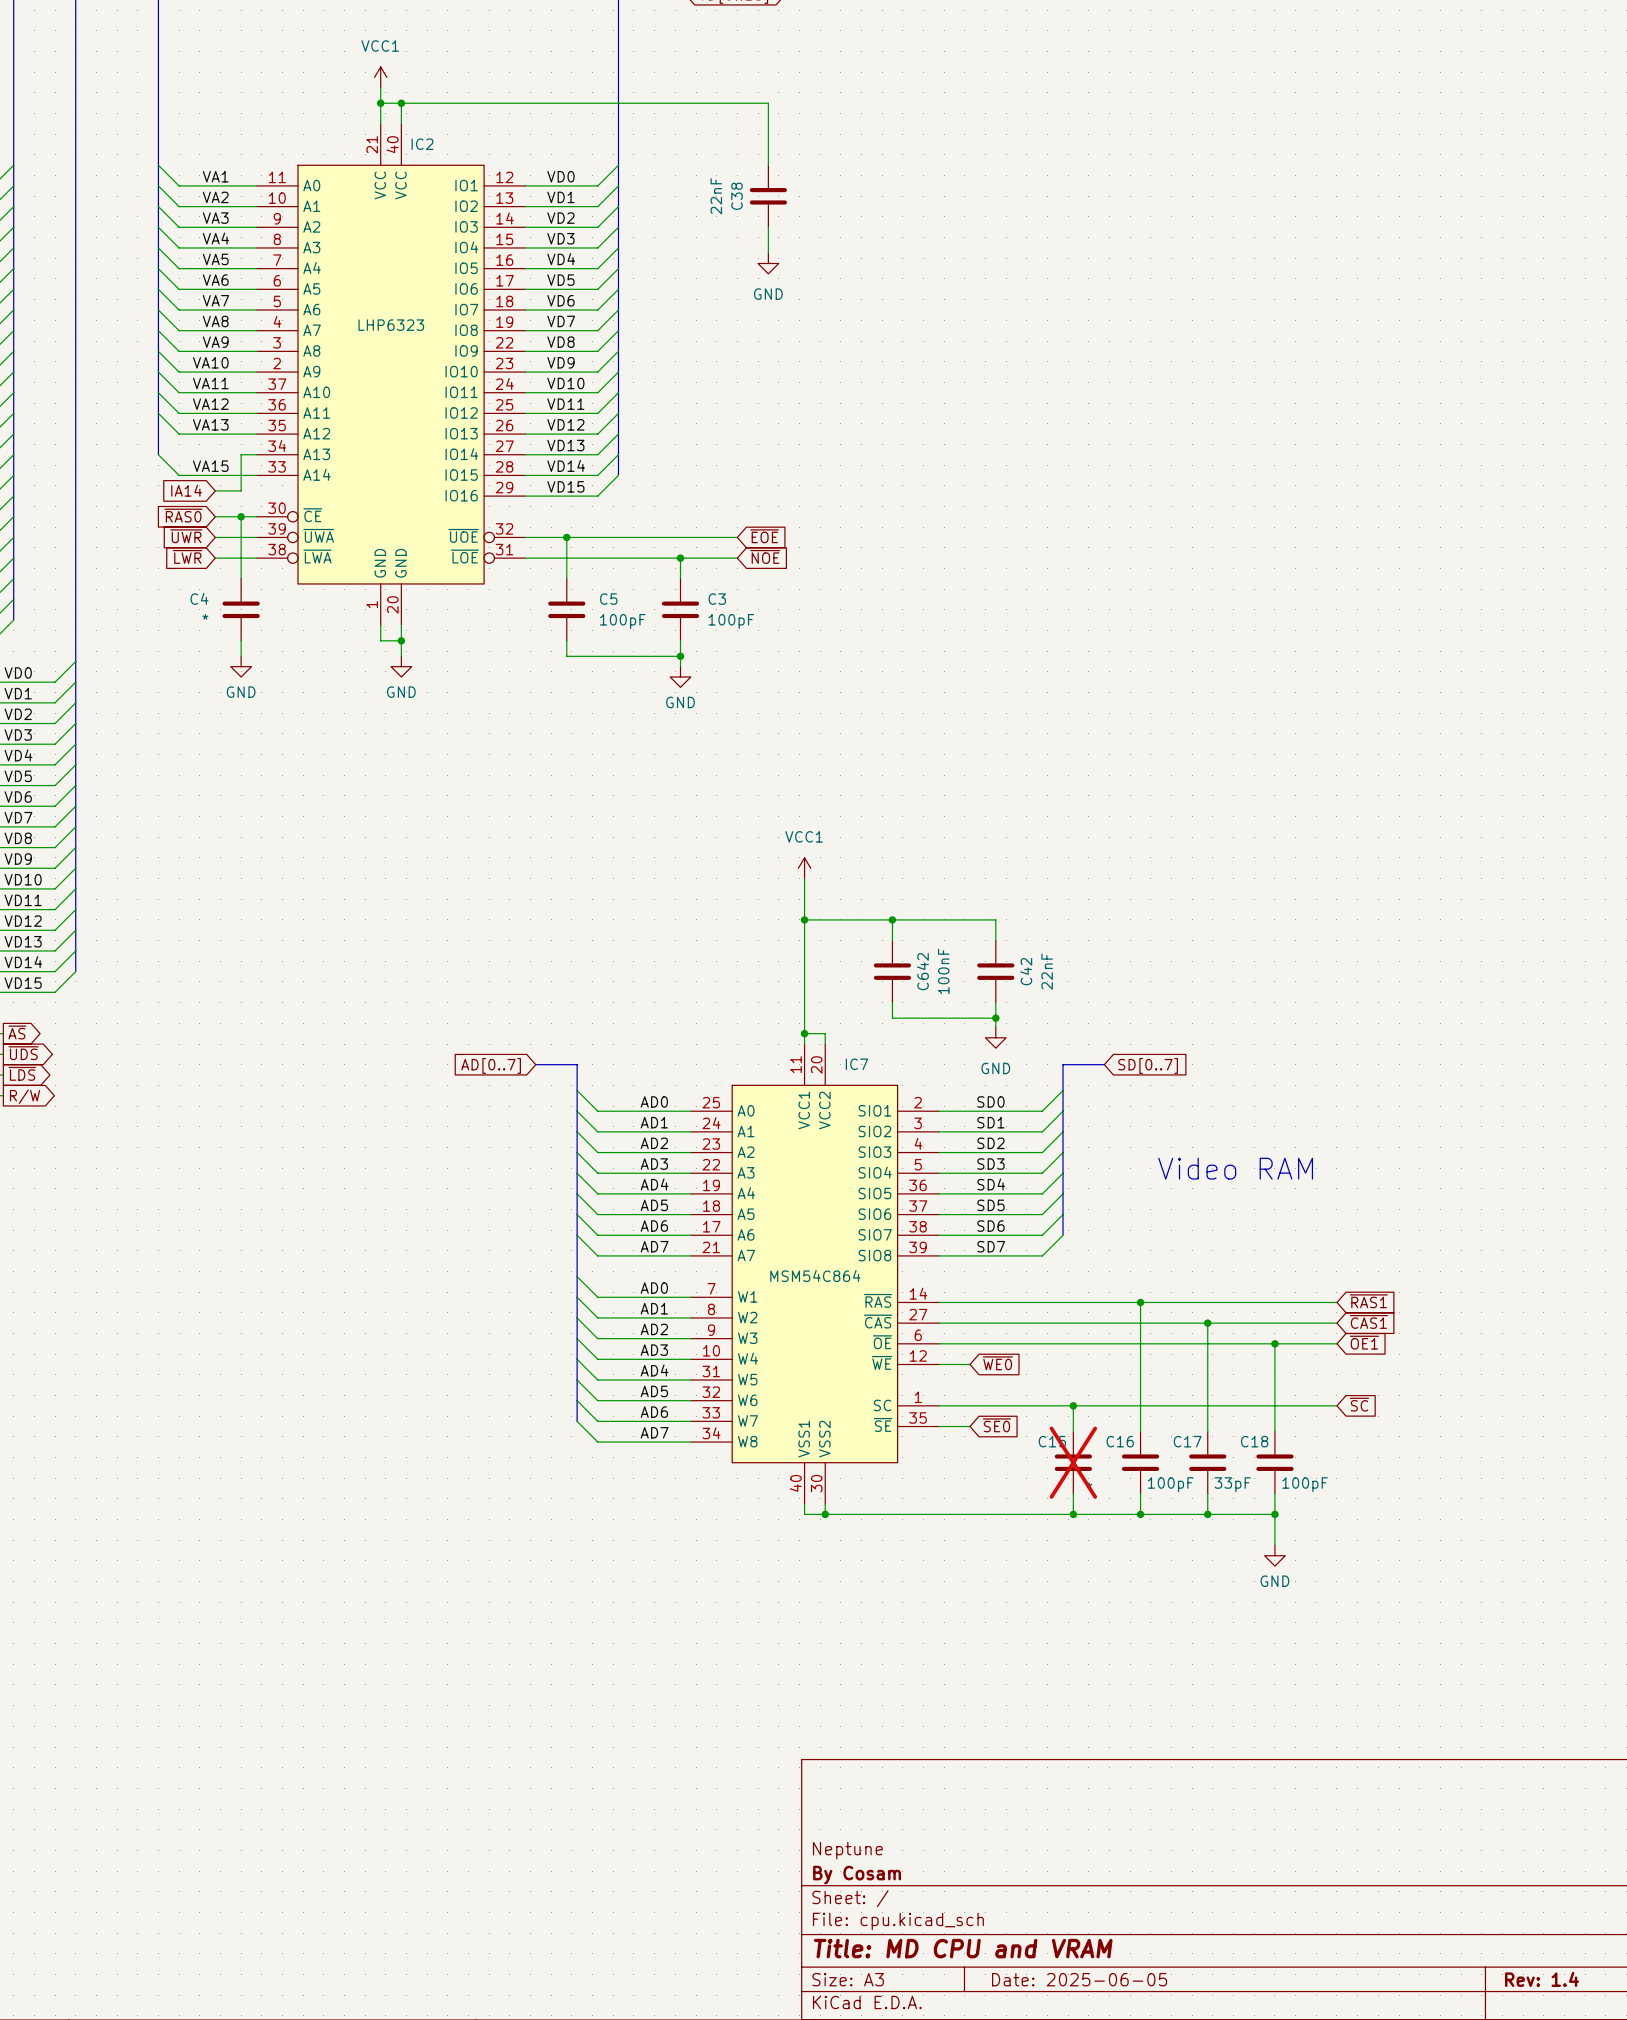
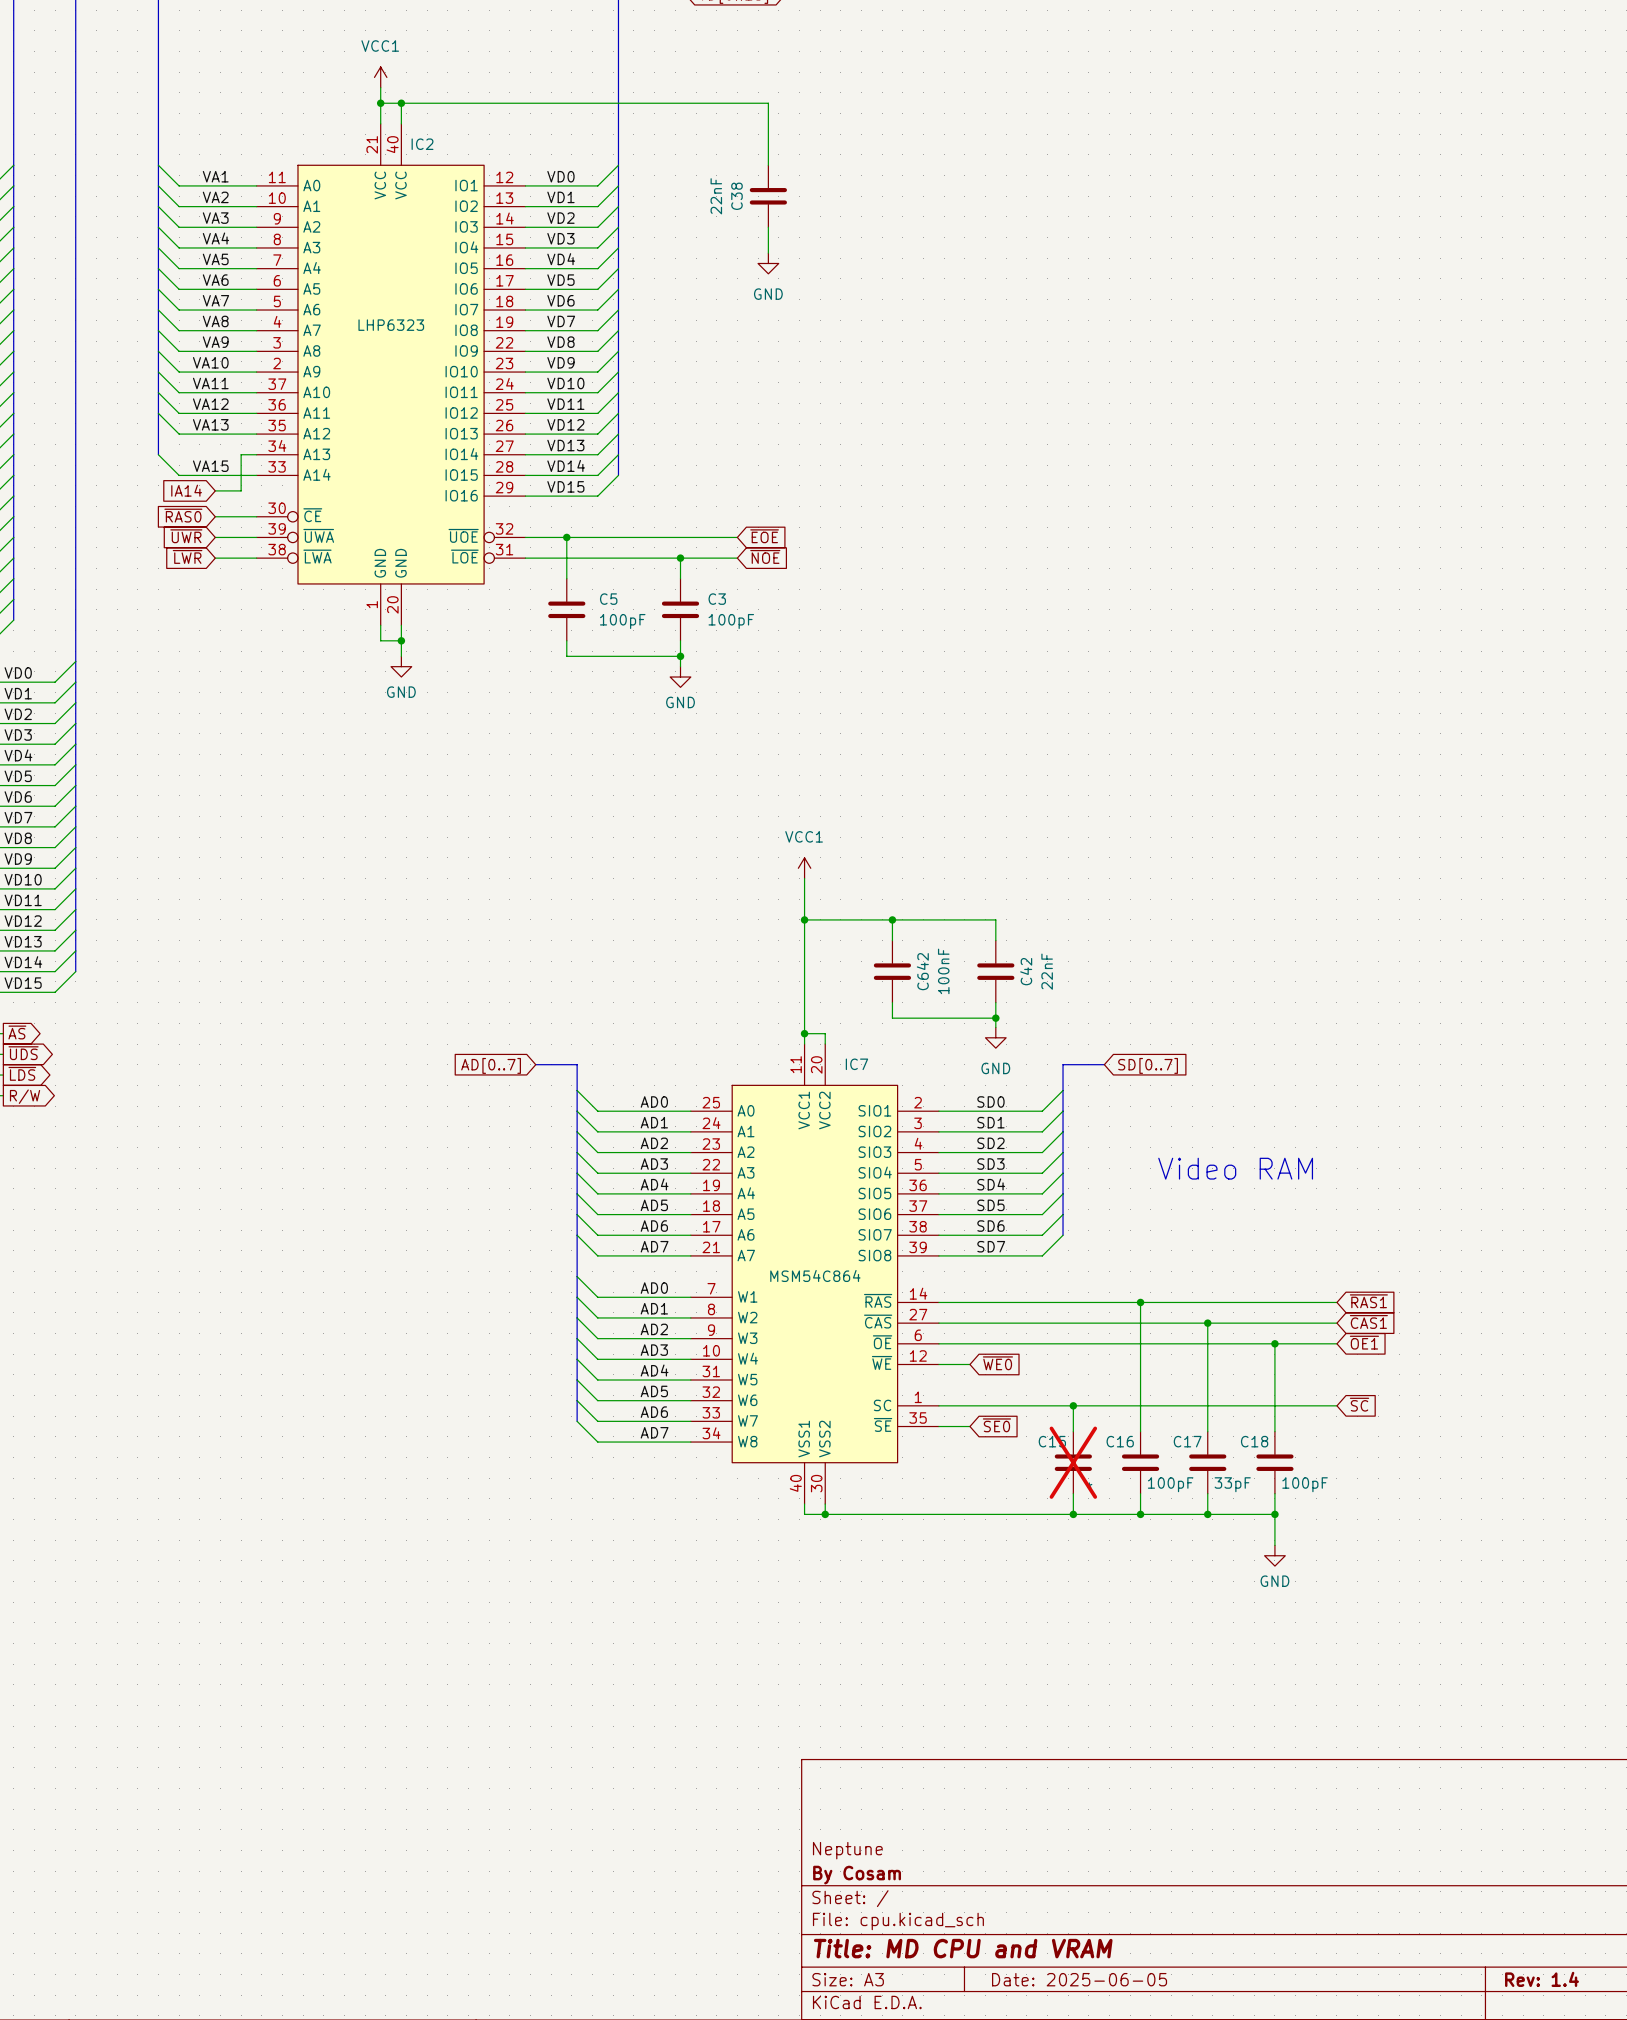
wire: (241, 516) (241, 578) -> none
junction: (241, 516) -> none
C4: * (241, 609) -> none
wire: (241, 640) (241, 656) -> none
power symbol: GND (241, 666) -> none

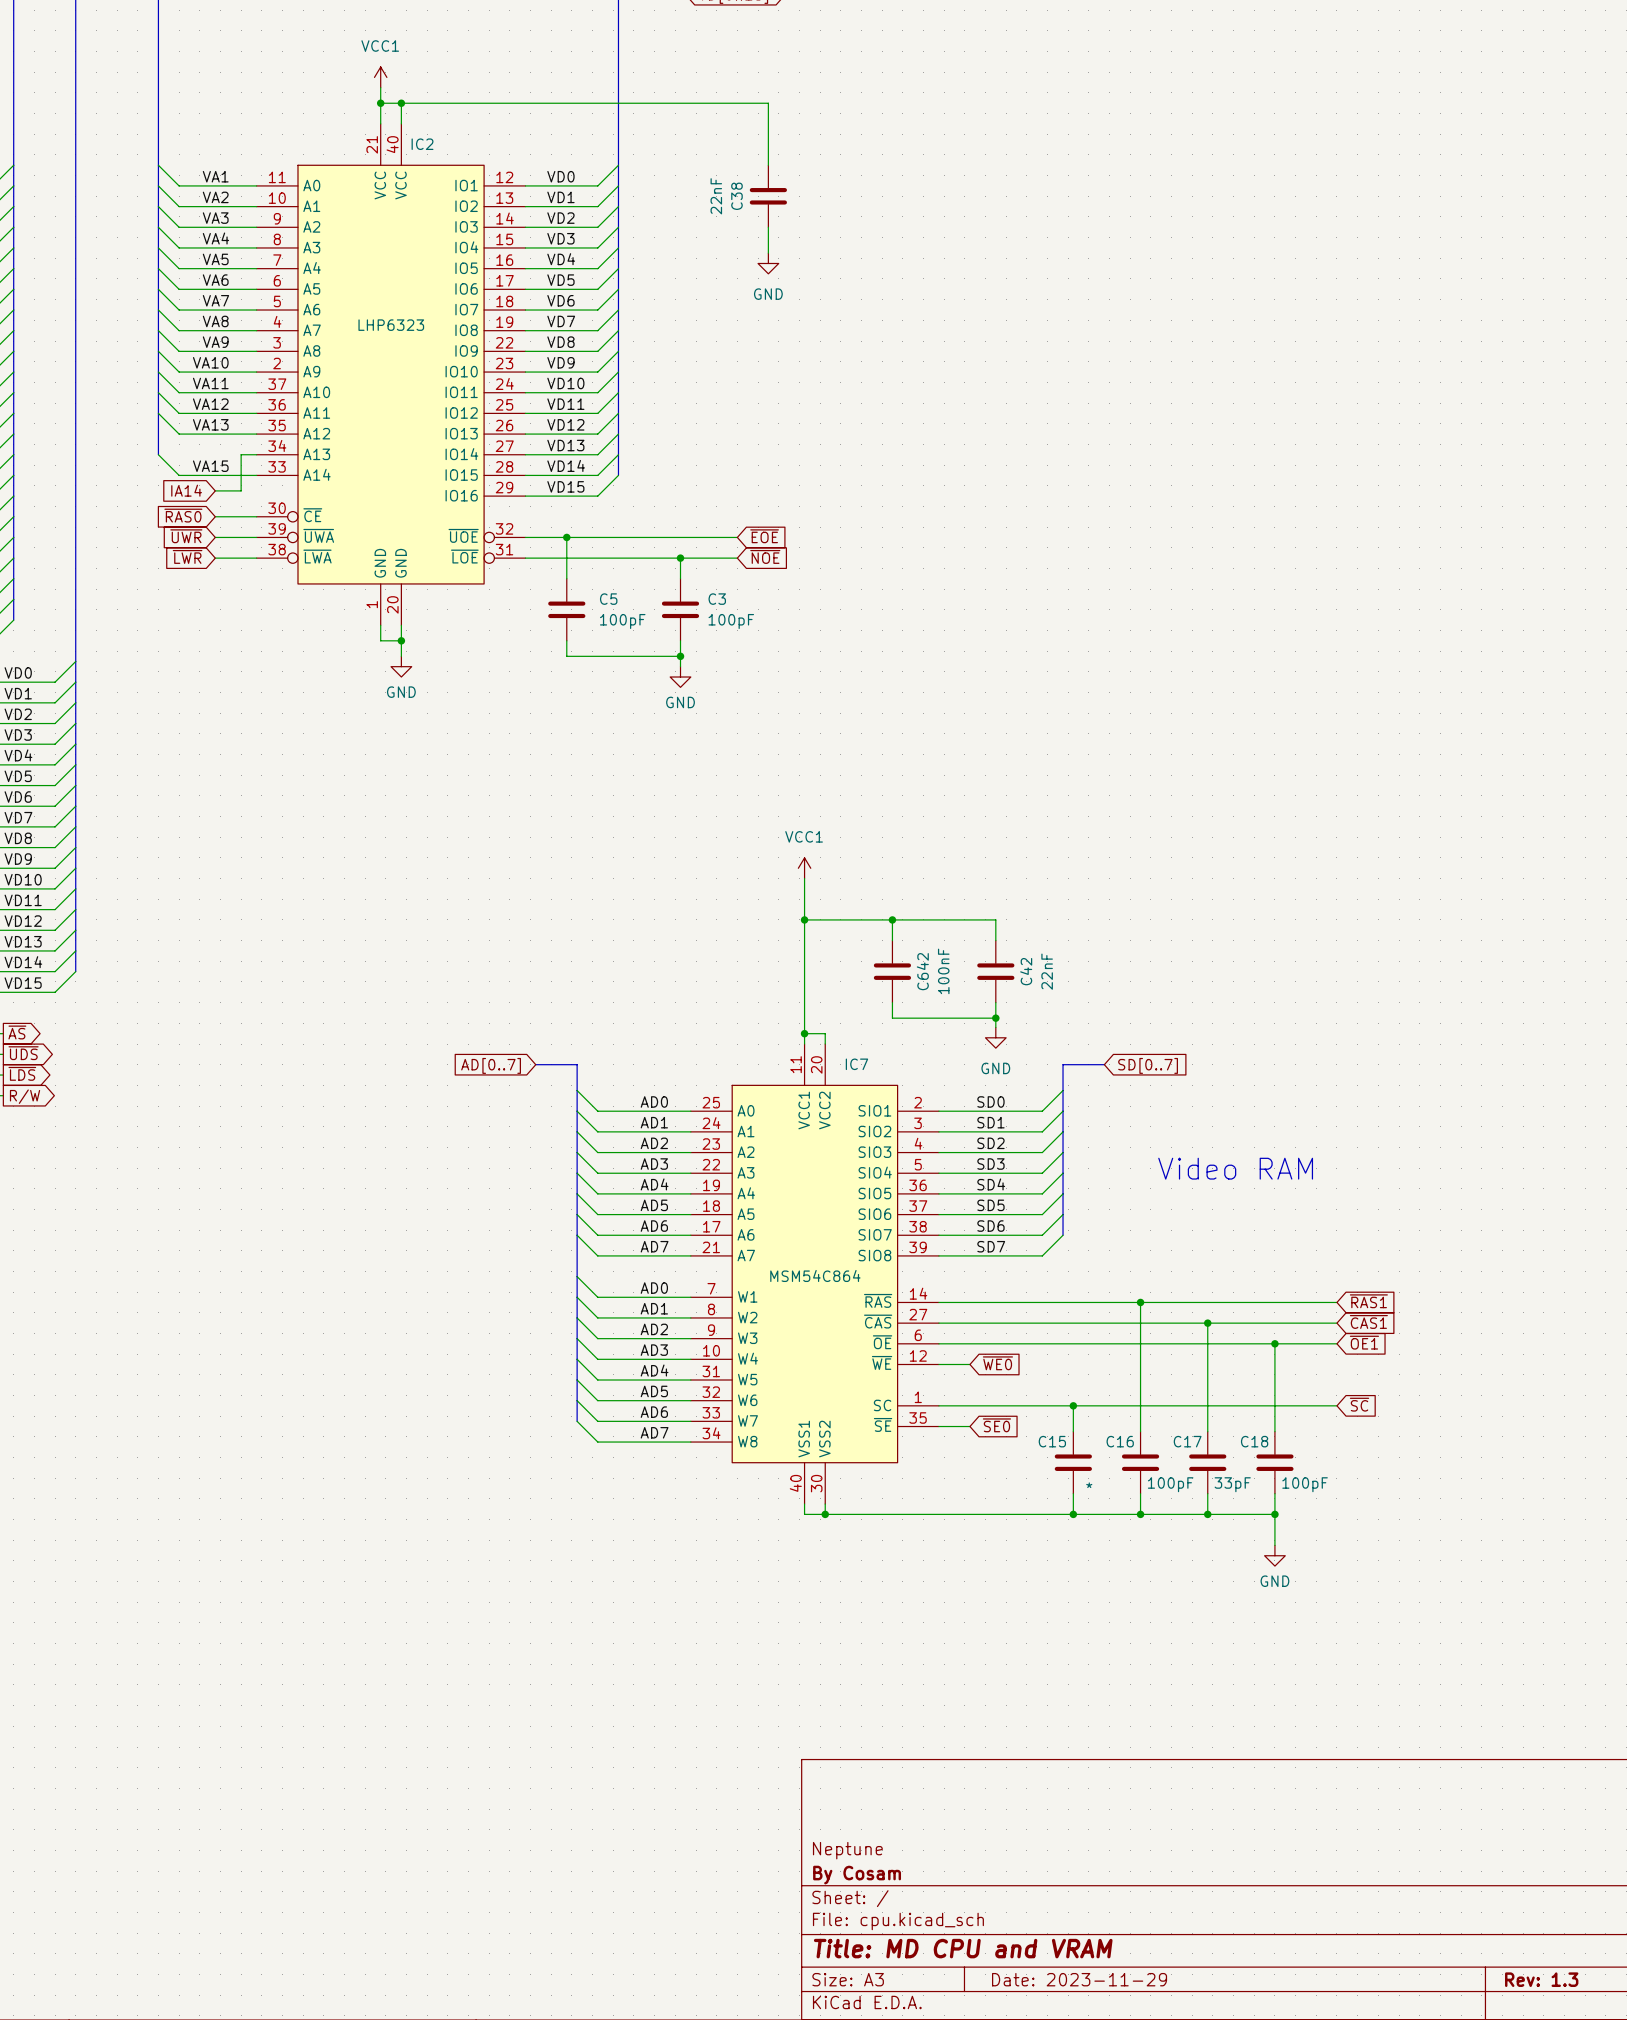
C15 do-not-place cross: (1073, 1462) -> none
title block: Date: 2025-06-05 (1079, 1979) -> Date: 2023-11-29 (1079, 1979)
title block: Rev: 1.4 (1542, 1979) -> Rev: 1.3 (1541, 1979)

